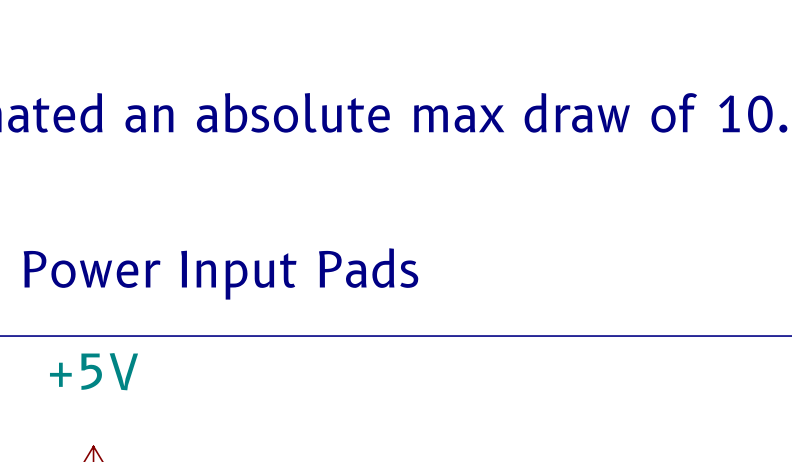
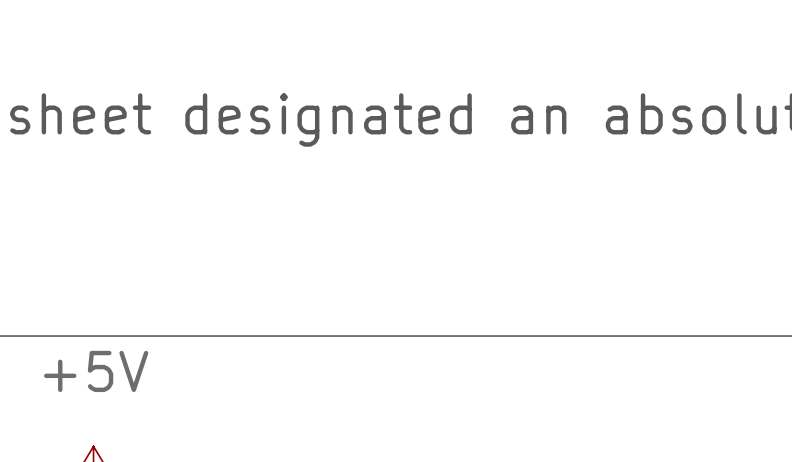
text: Power Input Pads (220, 273) -> none

